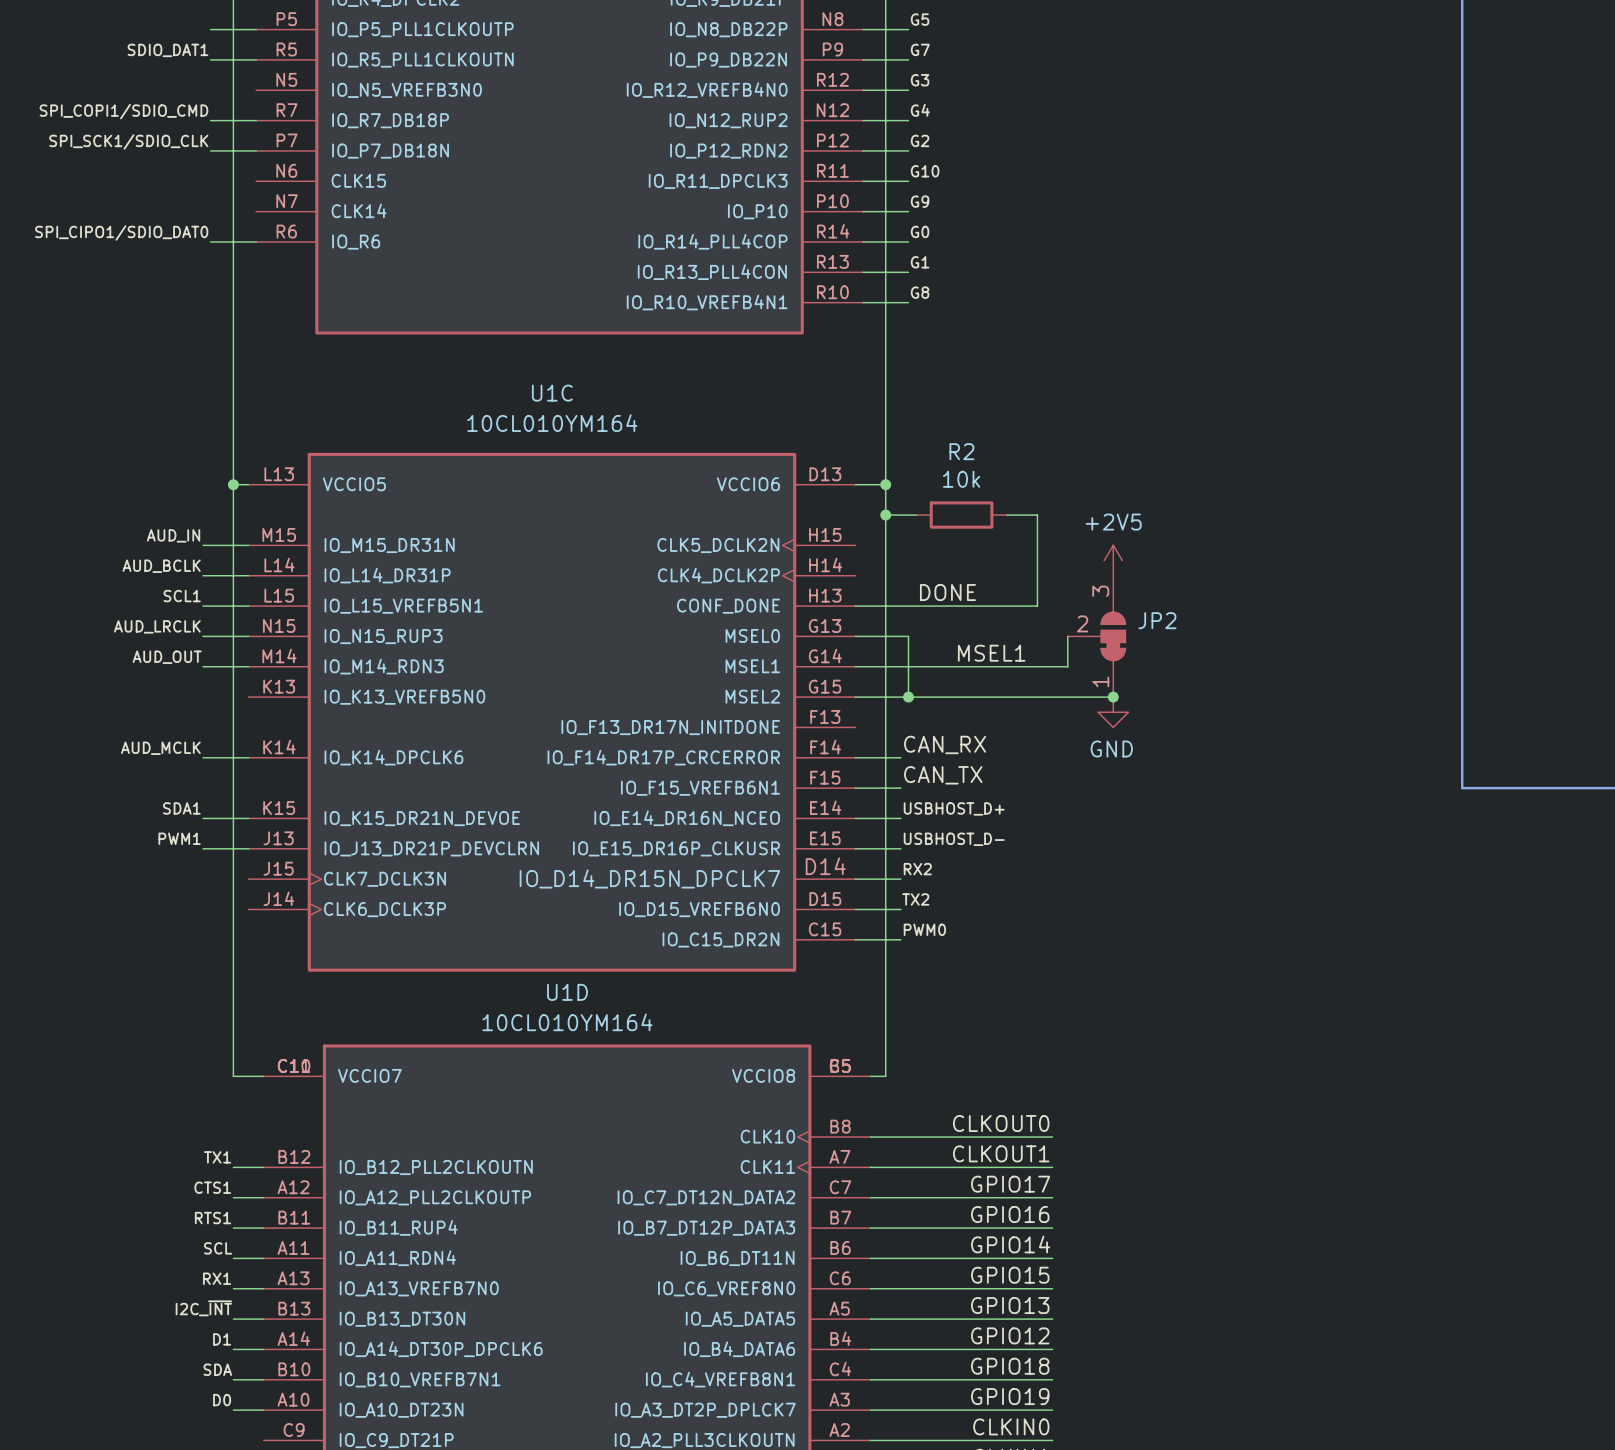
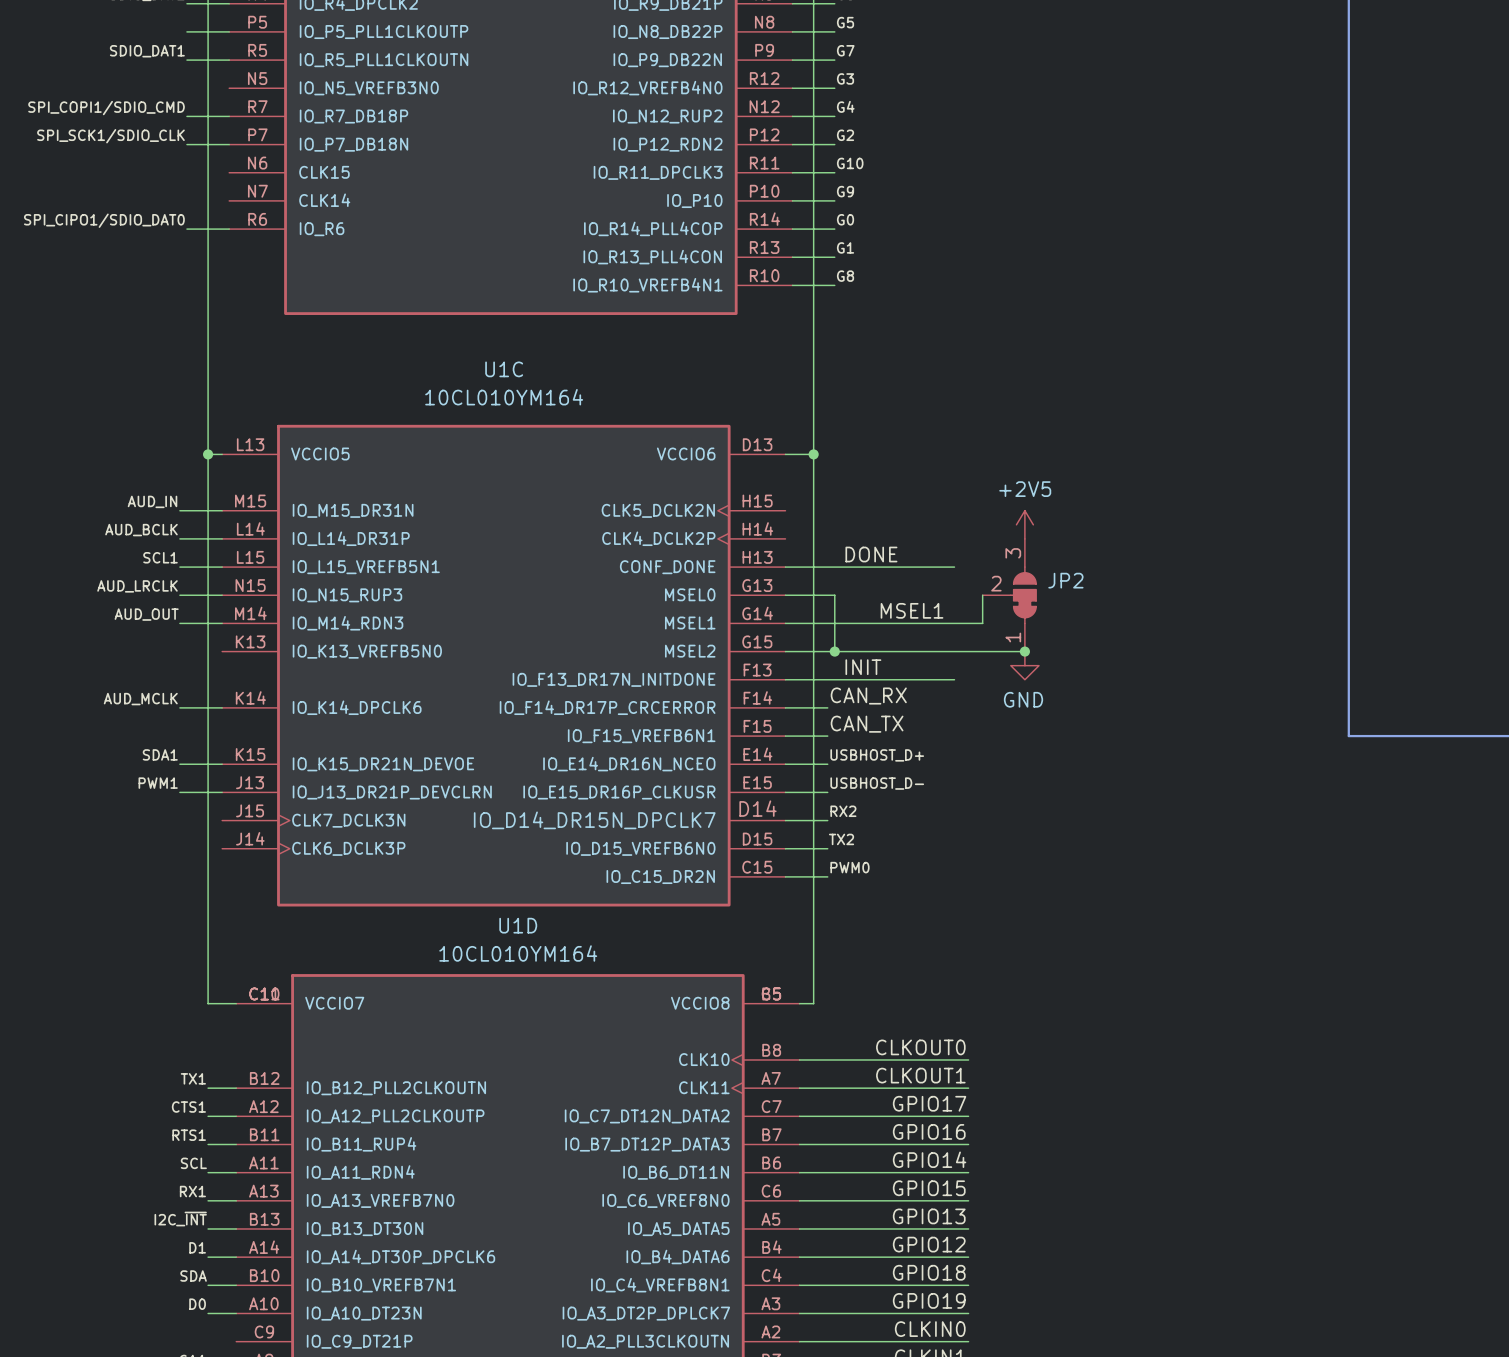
wire: (885, 515) (916, 515) -> none
junction: (885, 515) -> none
R2: 10k (961, 515) -> none
wire: (1007, 515) (1037, 515) (1037, 606) -> none
label: none -> INIT (863, 667)
wire: none -> (785, 679) (954, 679)

